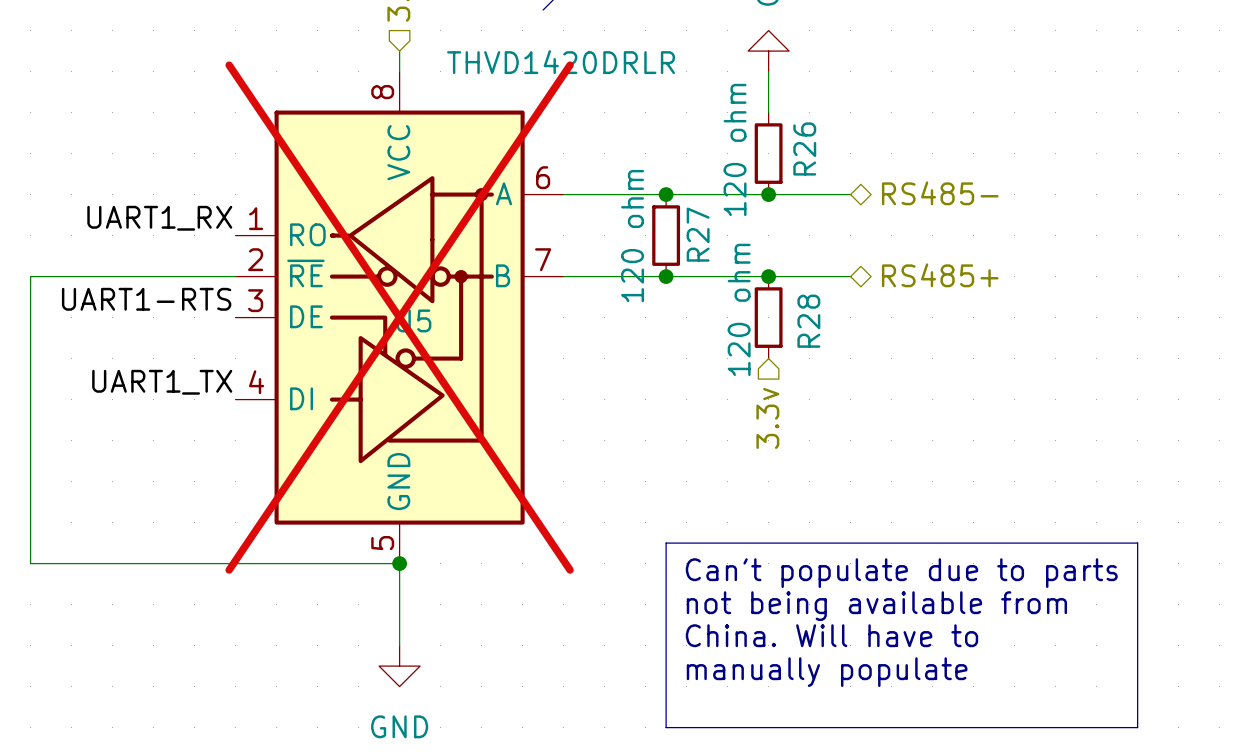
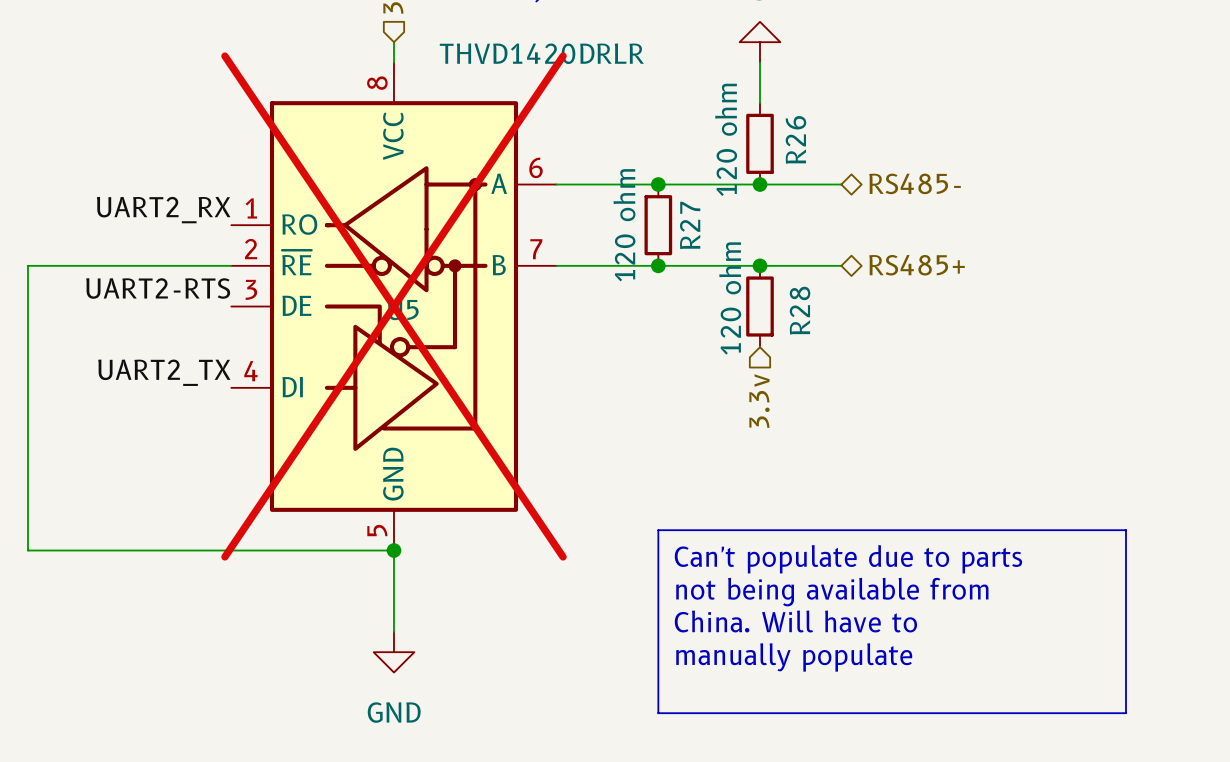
label: UART1_RX (159, 218) -> UART2_RX (163, 210)
label: UART1-RTS (146, 299) -> UART2-RTS (158, 288)
label: UART1_TX (162, 382) -> UART2_TX (164, 372)

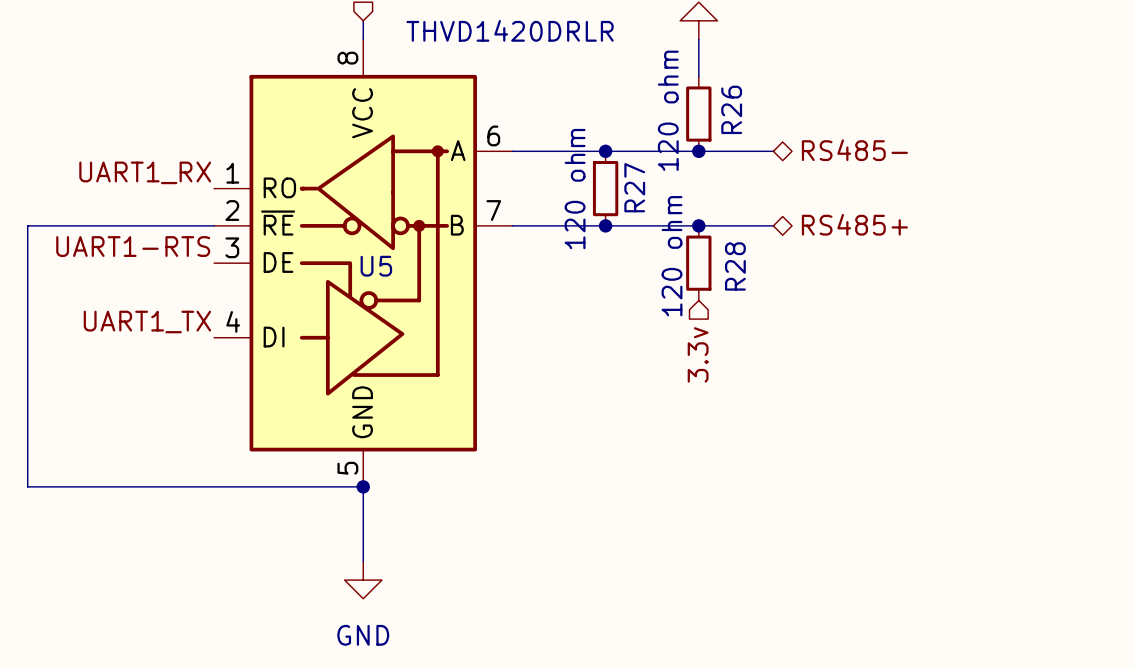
label: UART2_RX (163, 210) -> UART1_RX (145, 172)
label: UART2-RTS (158, 288) -> UART1-RTS (133, 246)
U5 do-not-place cross: (394, 306) -> none
label: UART2_TX (164, 372) -> UART1_TX (147, 321)
line: (658, 530) (1126, 530) (1126, 713) (658, 713) (658, 530) -> none
text: Can't populate due to parts (848, 559) -> none
text: not being available from (832, 592) -> none
text: China. Will have to (795, 621) -> none
text: manually populate (794, 657) -> none

